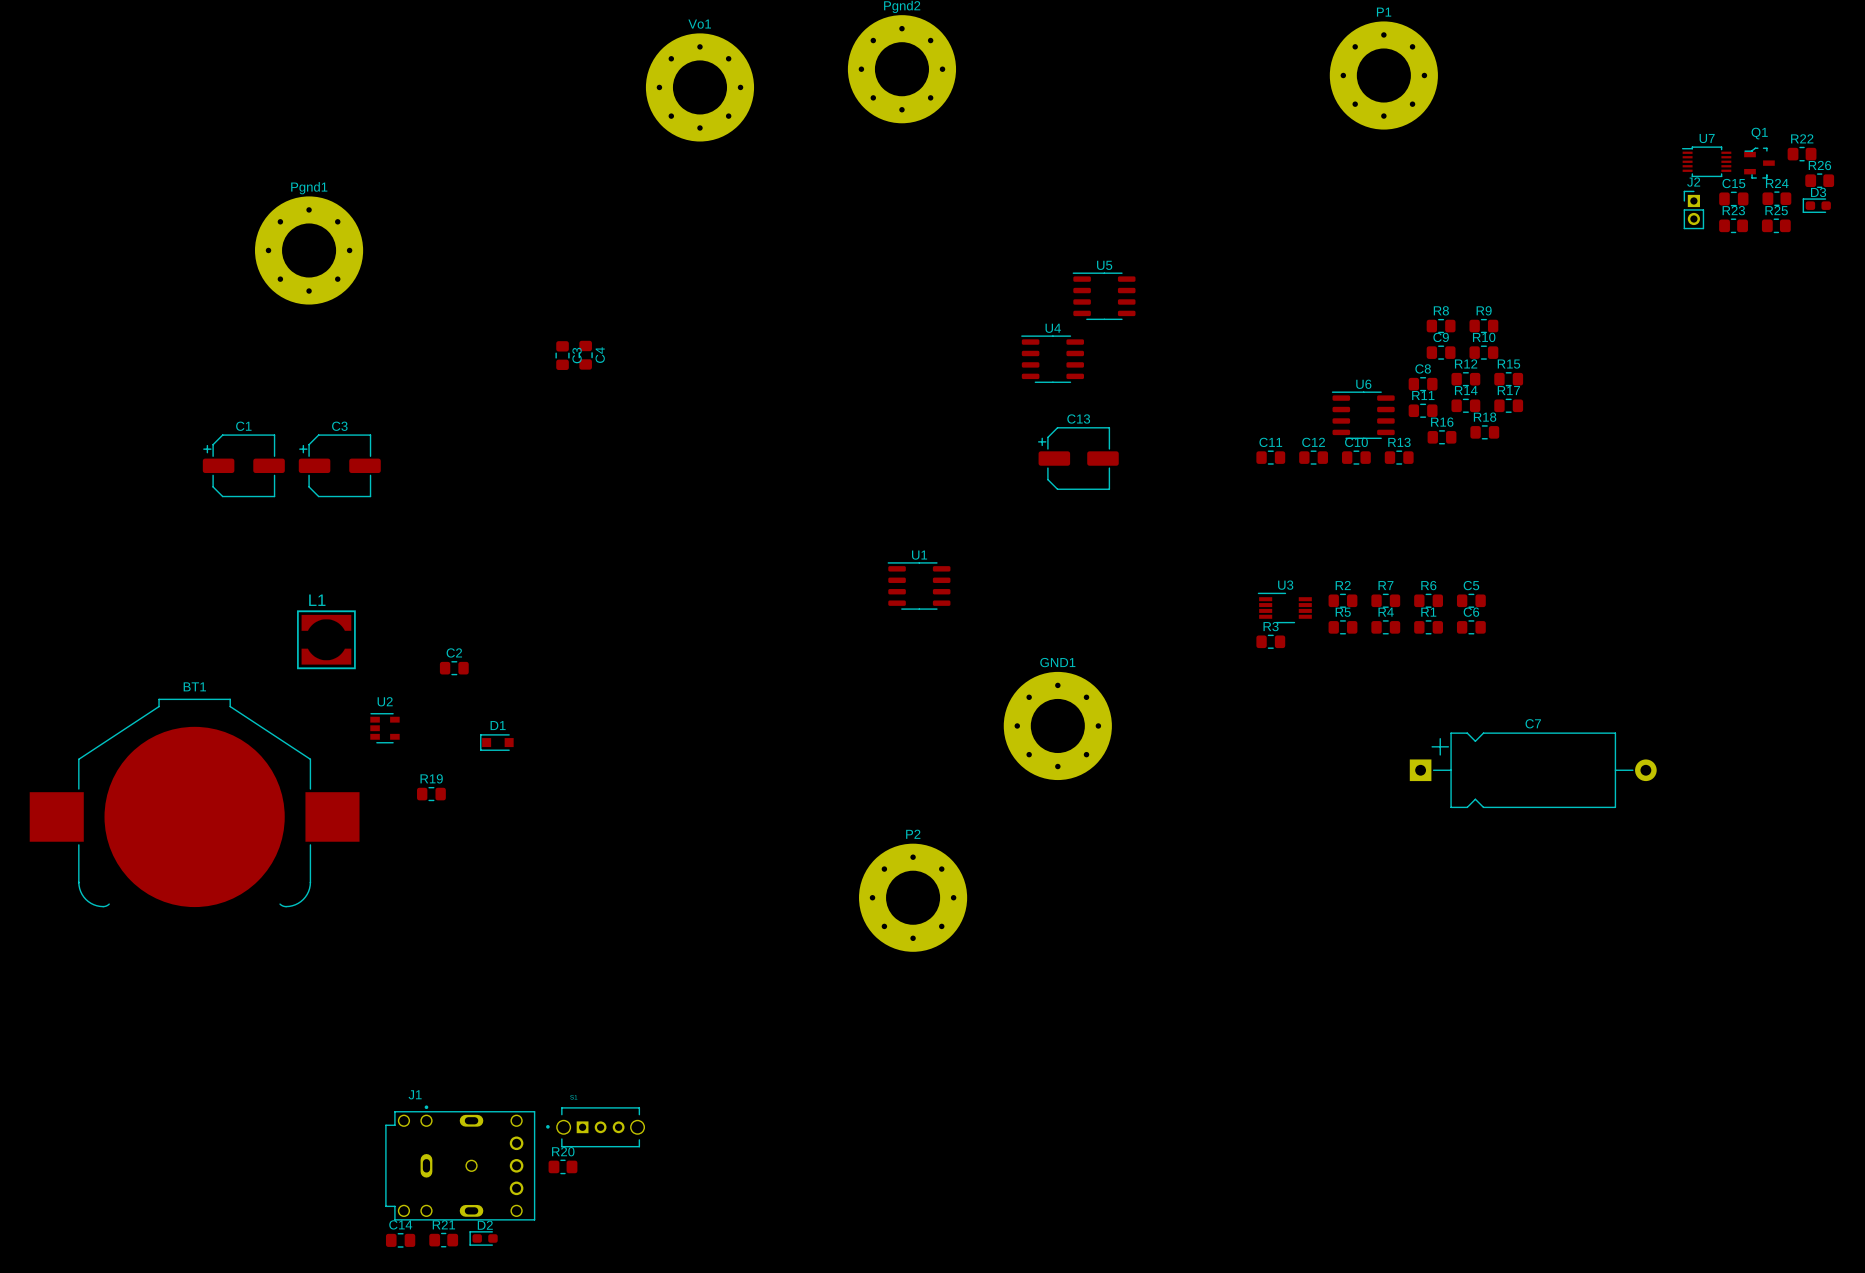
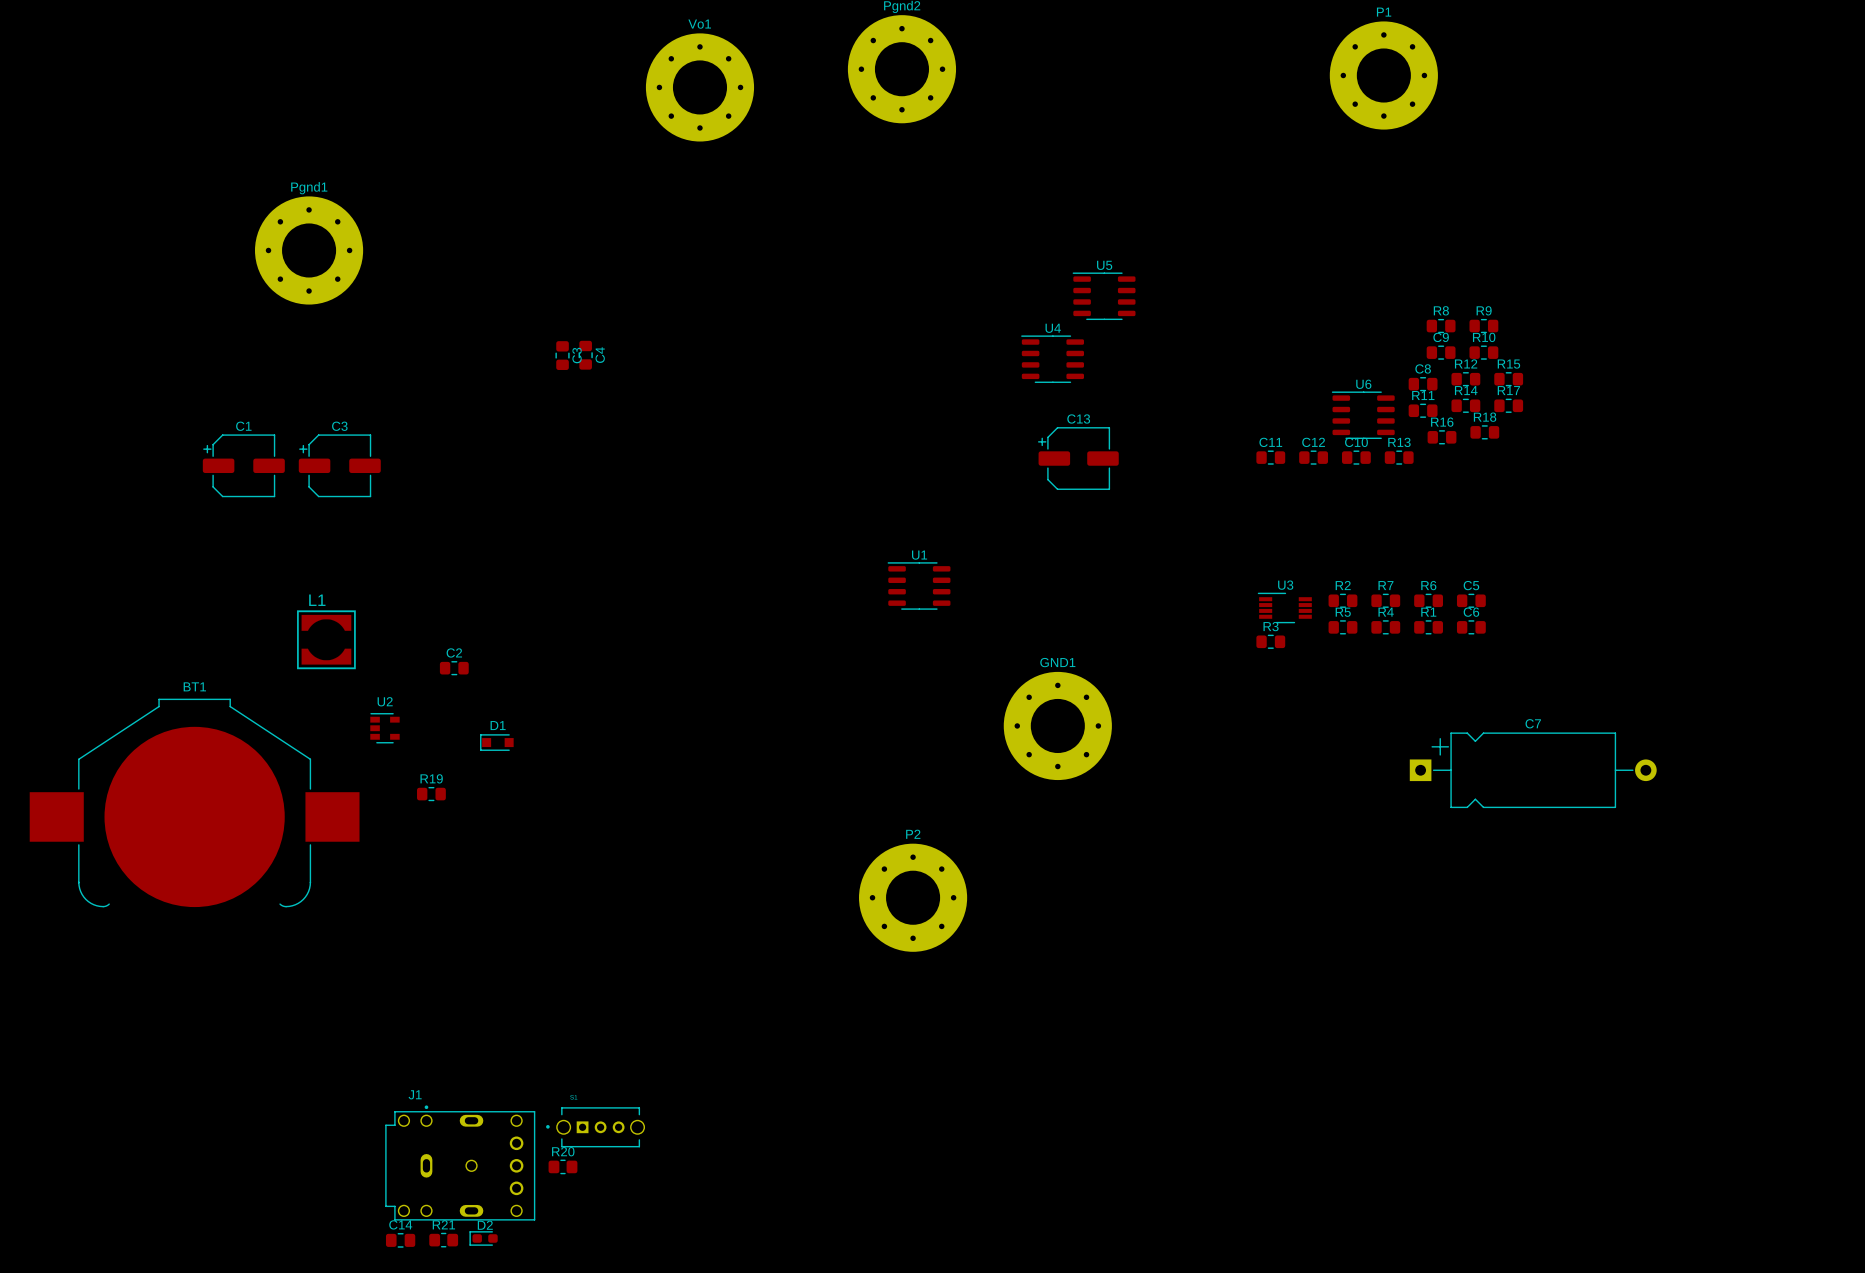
R22: (1802, 154) -> none
U7: (1706, 161) -> none
Q1: (1759, 163) -> none
R26: (1819, 180) -> none
C15: (1733, 198) -> none
R24: (1776, 198) -> none
D3: (1816, 205) -> none
J2: (1693, 209) -> none
R23: (1733, 225) -> none
R25: (1776, 225) -> none

